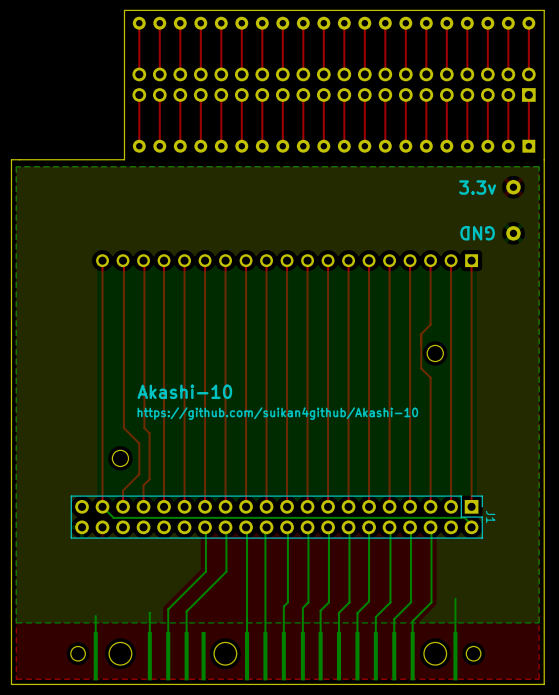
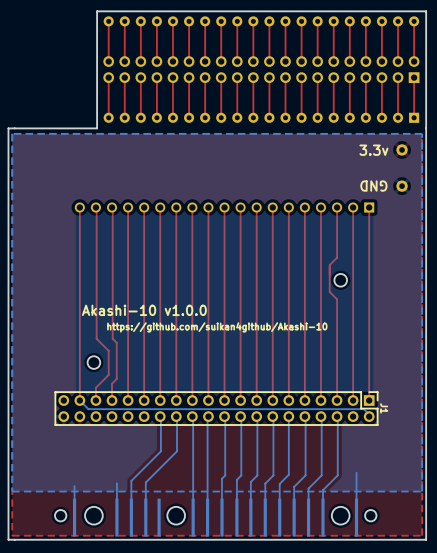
text: Akashi-10 (184, 391) -> Akashi-10 v1.0.0 (144, 310)

